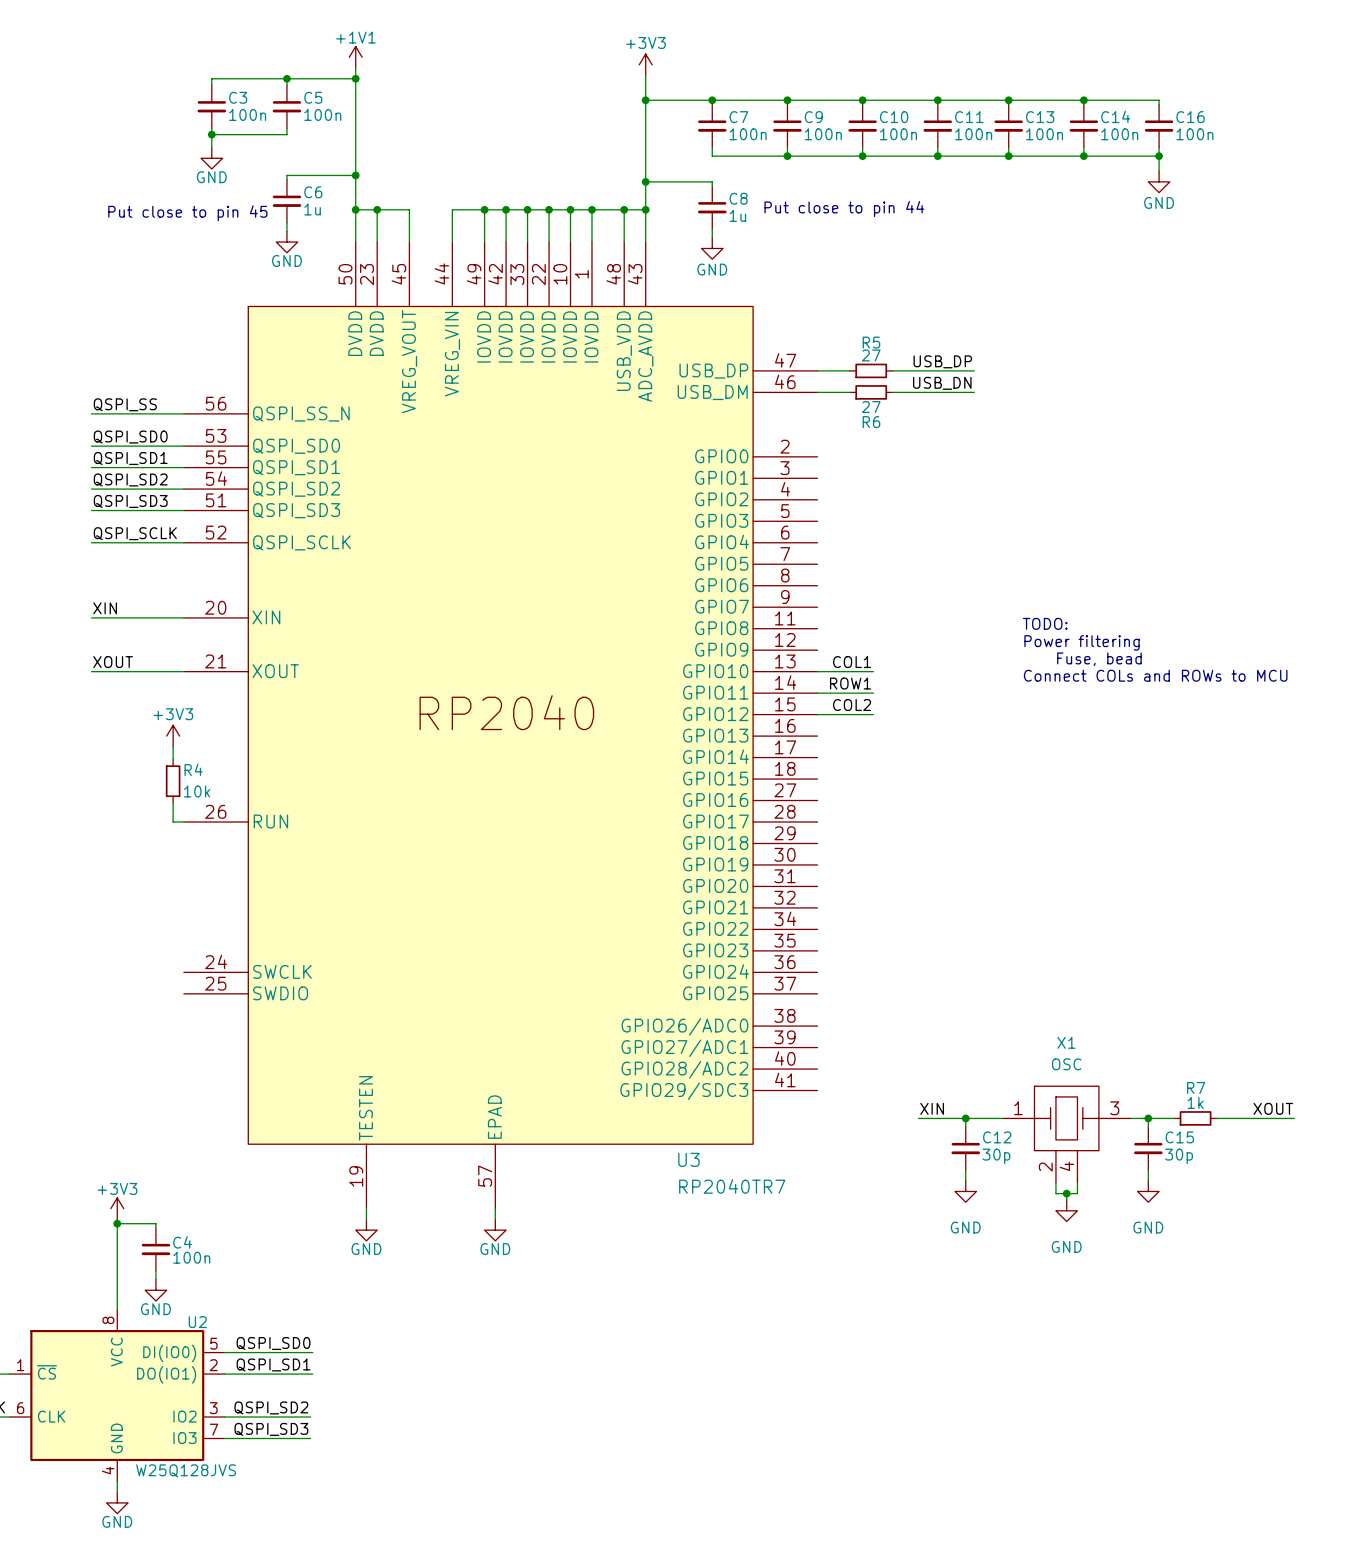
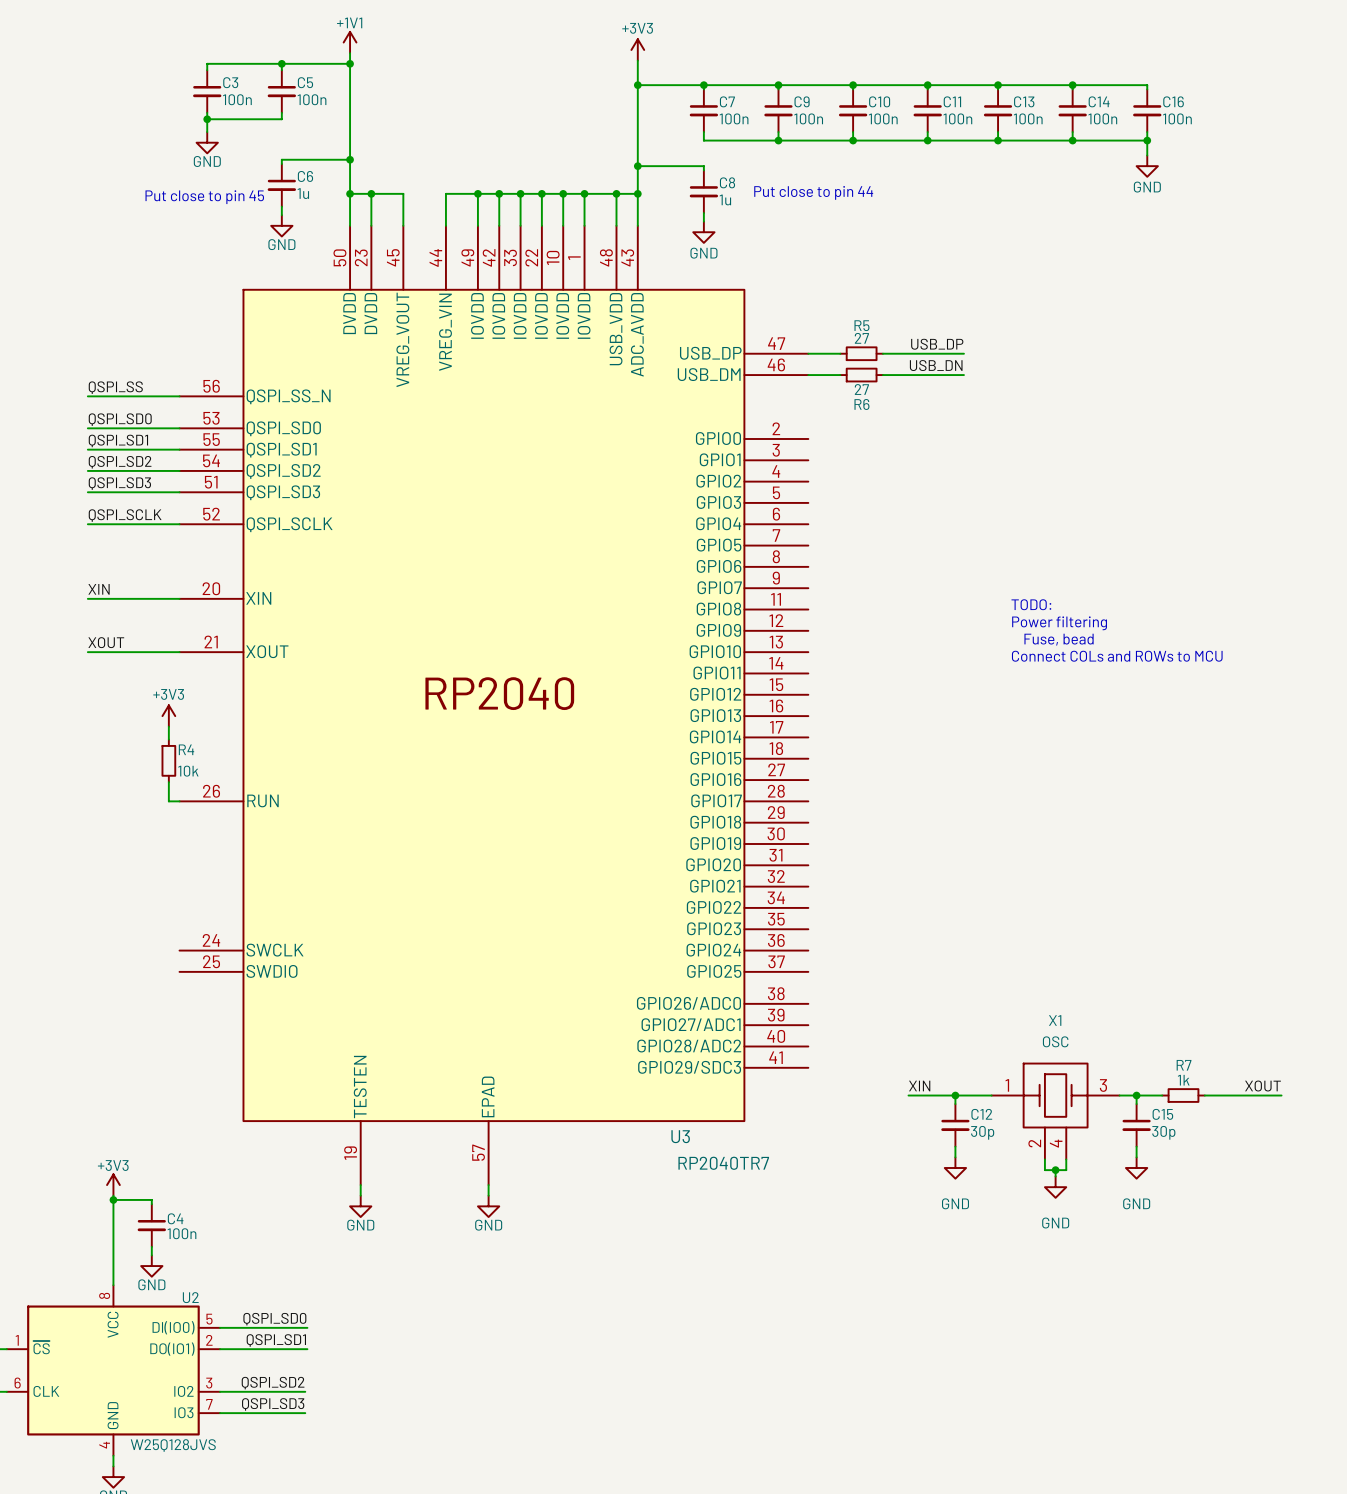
label: COL1 (852, 662) -> none
wire: (817, 671) (873, 671) -> none
label: ROW1 (850, 683) -> none
wire: (817, 693) (873, 693) -> none
label: COL2 (852, 705) -> none
wire: (817, 714) (873, 714) -> none

